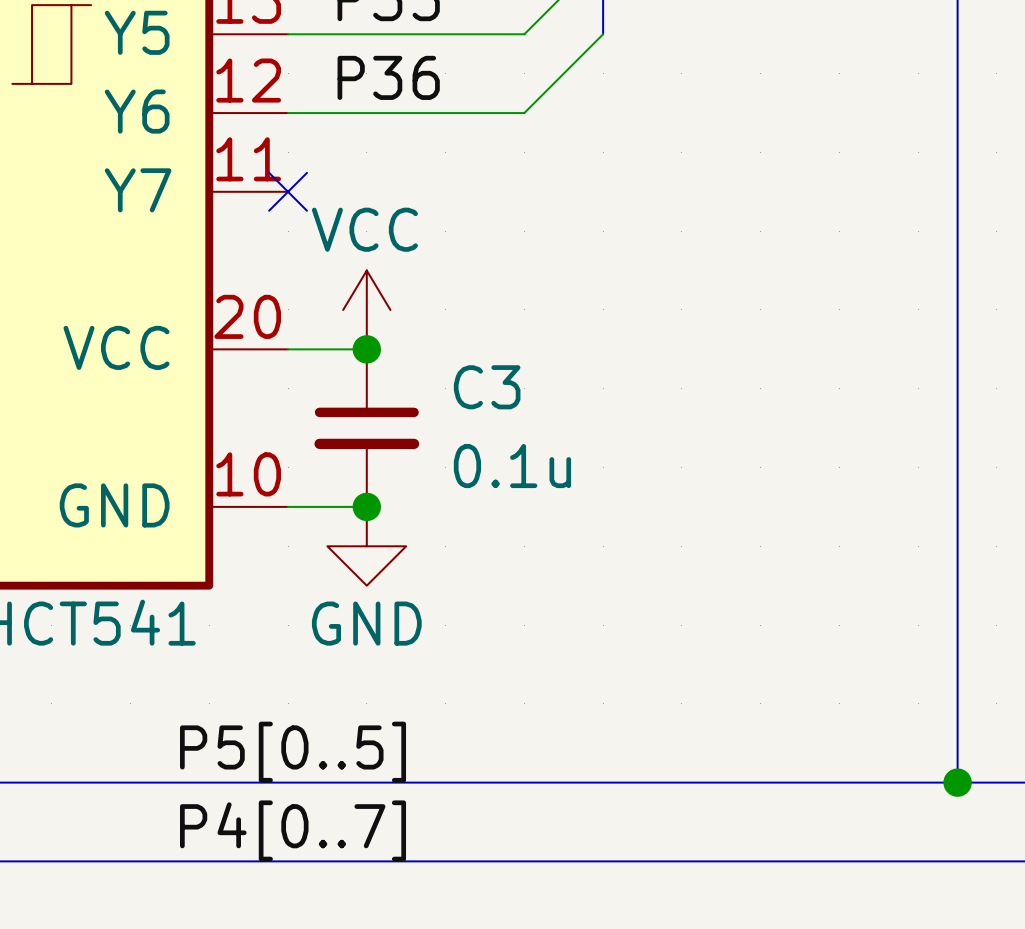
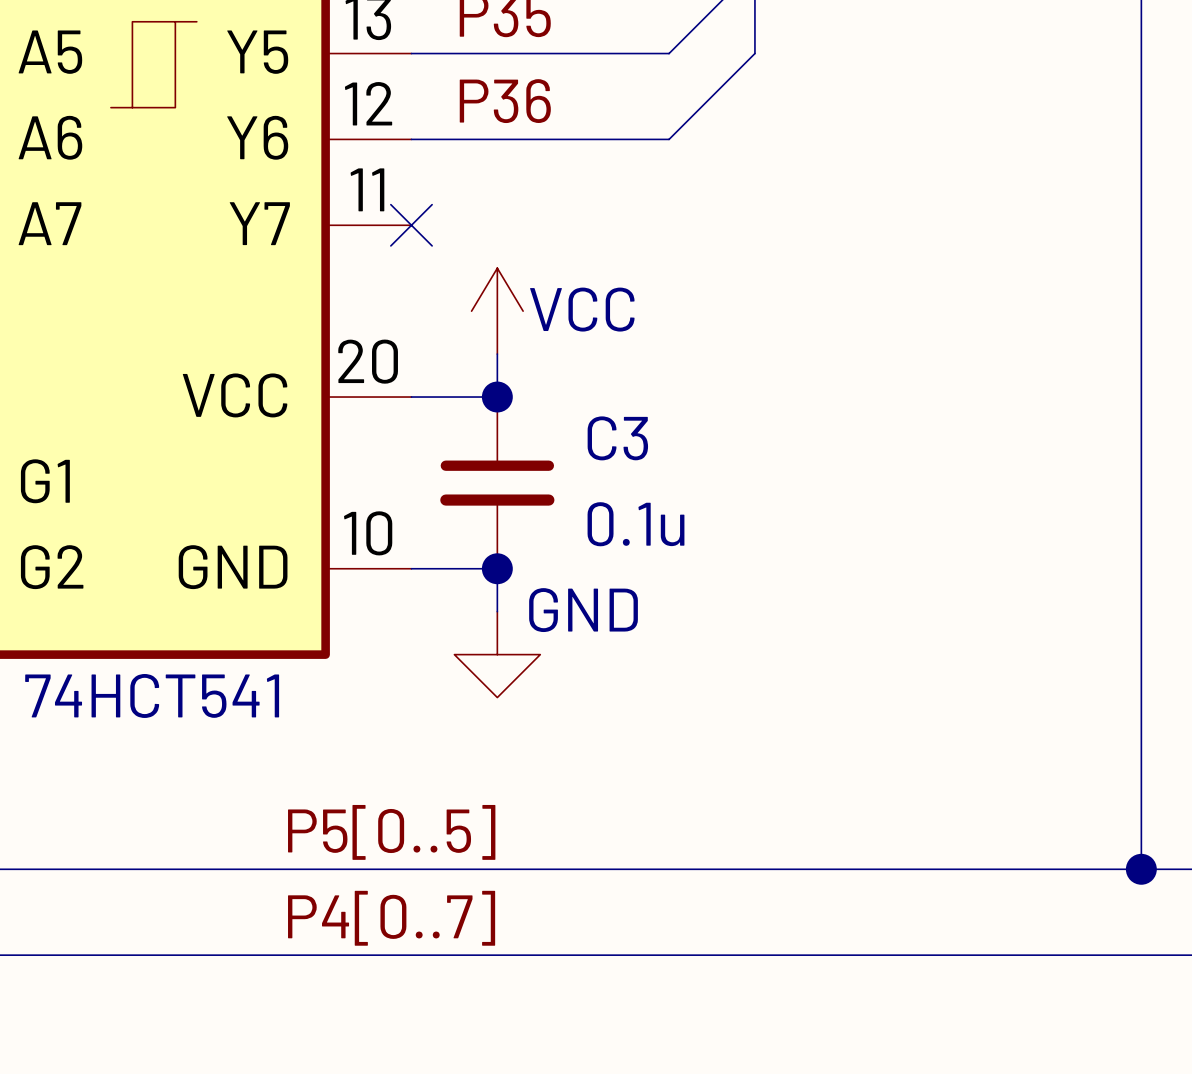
power symbol text position: VCC (364, 229) -> VCC (582, 309)
power symbol position: VCC (366, 309) -> VCC (497, 311)
power symbol position: GND (366, 546) -> GND (497, 654)
power symbol text position: GND (366, 623) -> GND (583, 610)

